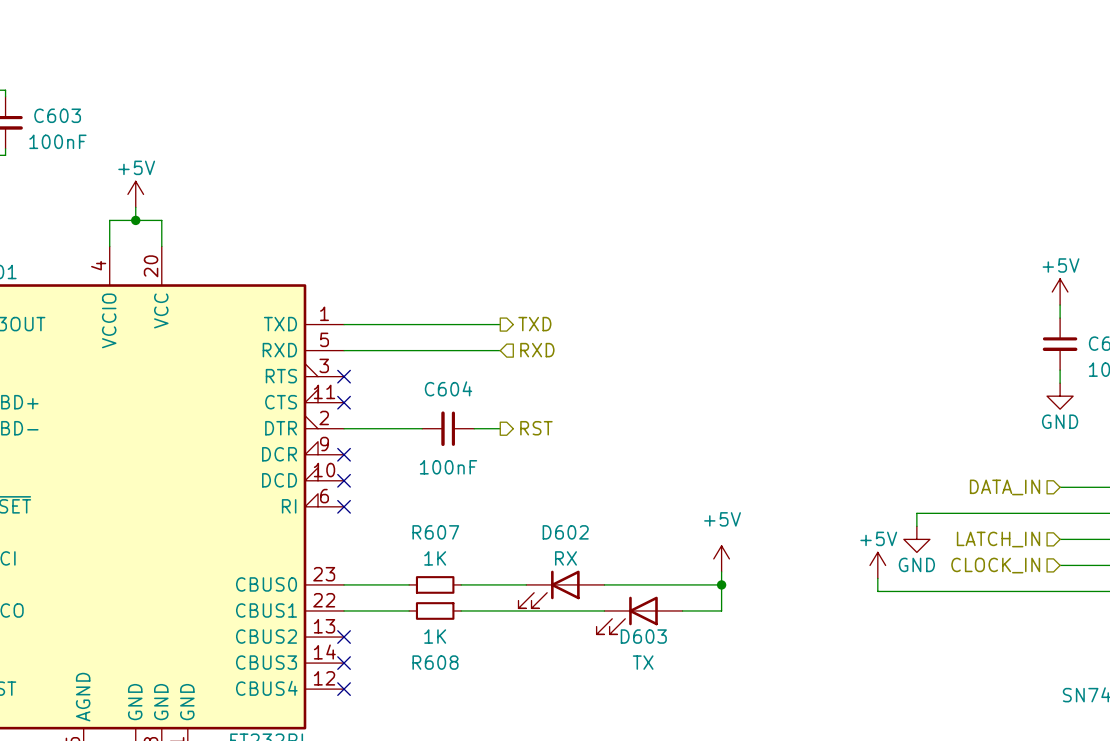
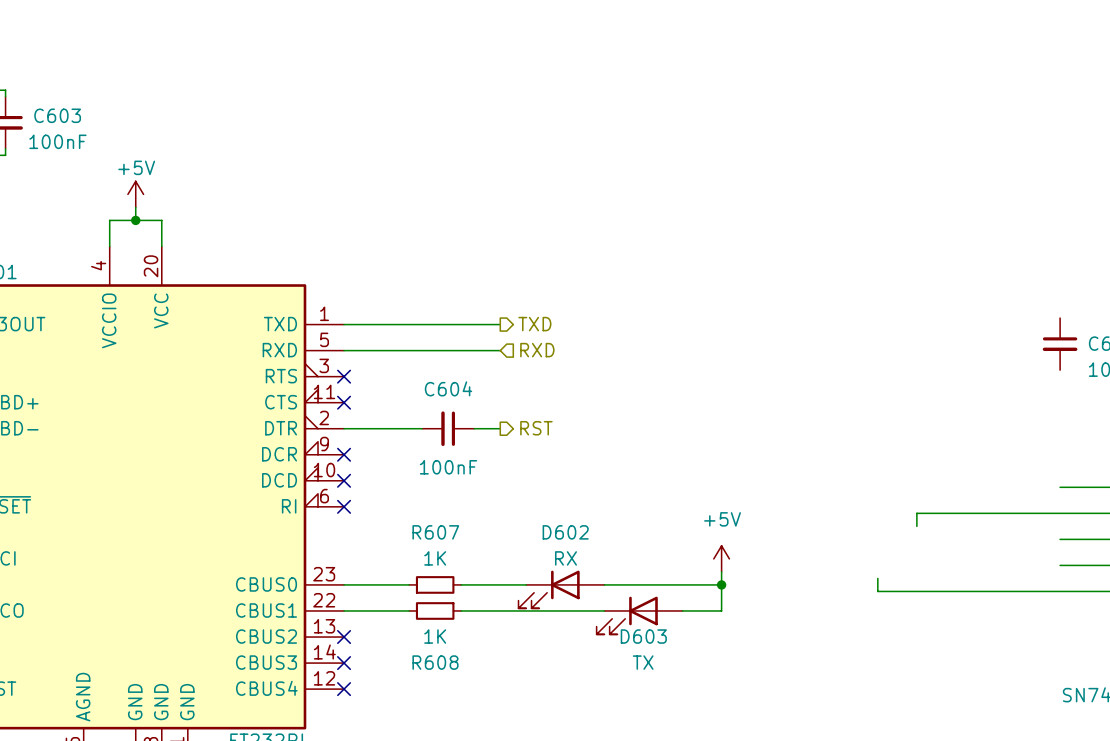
power symbol: +5V (1060, 292) -> none
wire: (1060, 305) (1060, 318) -> none
wire: (1060, 370) (1060, 383) -> none
power symbol: GND (1060, 396) -> none
hierarchical label: DATA_IN (1005, 487) -> none
power symbol: GND (916, 539) -> none
hierarchical label: LATCH_IN (998, 539) -> none
power symbol: +5V (877, 565) -> none
hierarchical label: CLOCK_IN (995, 565) -> none

